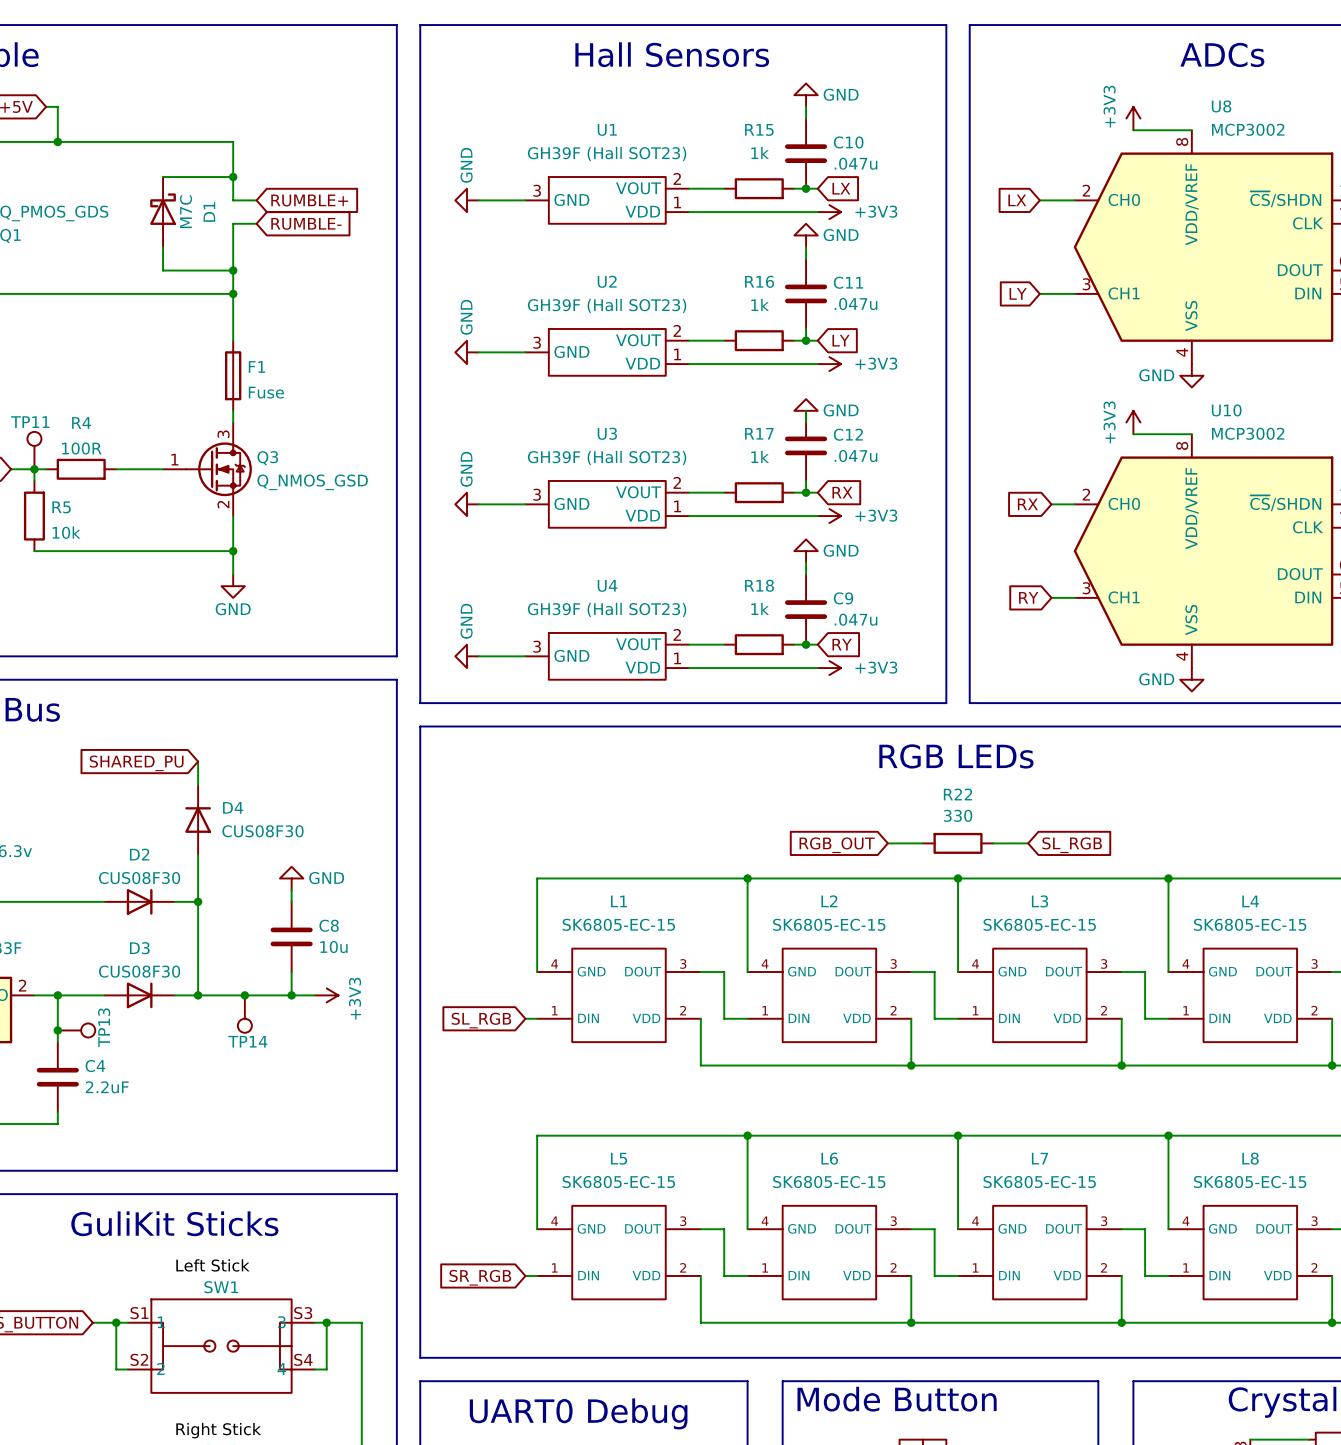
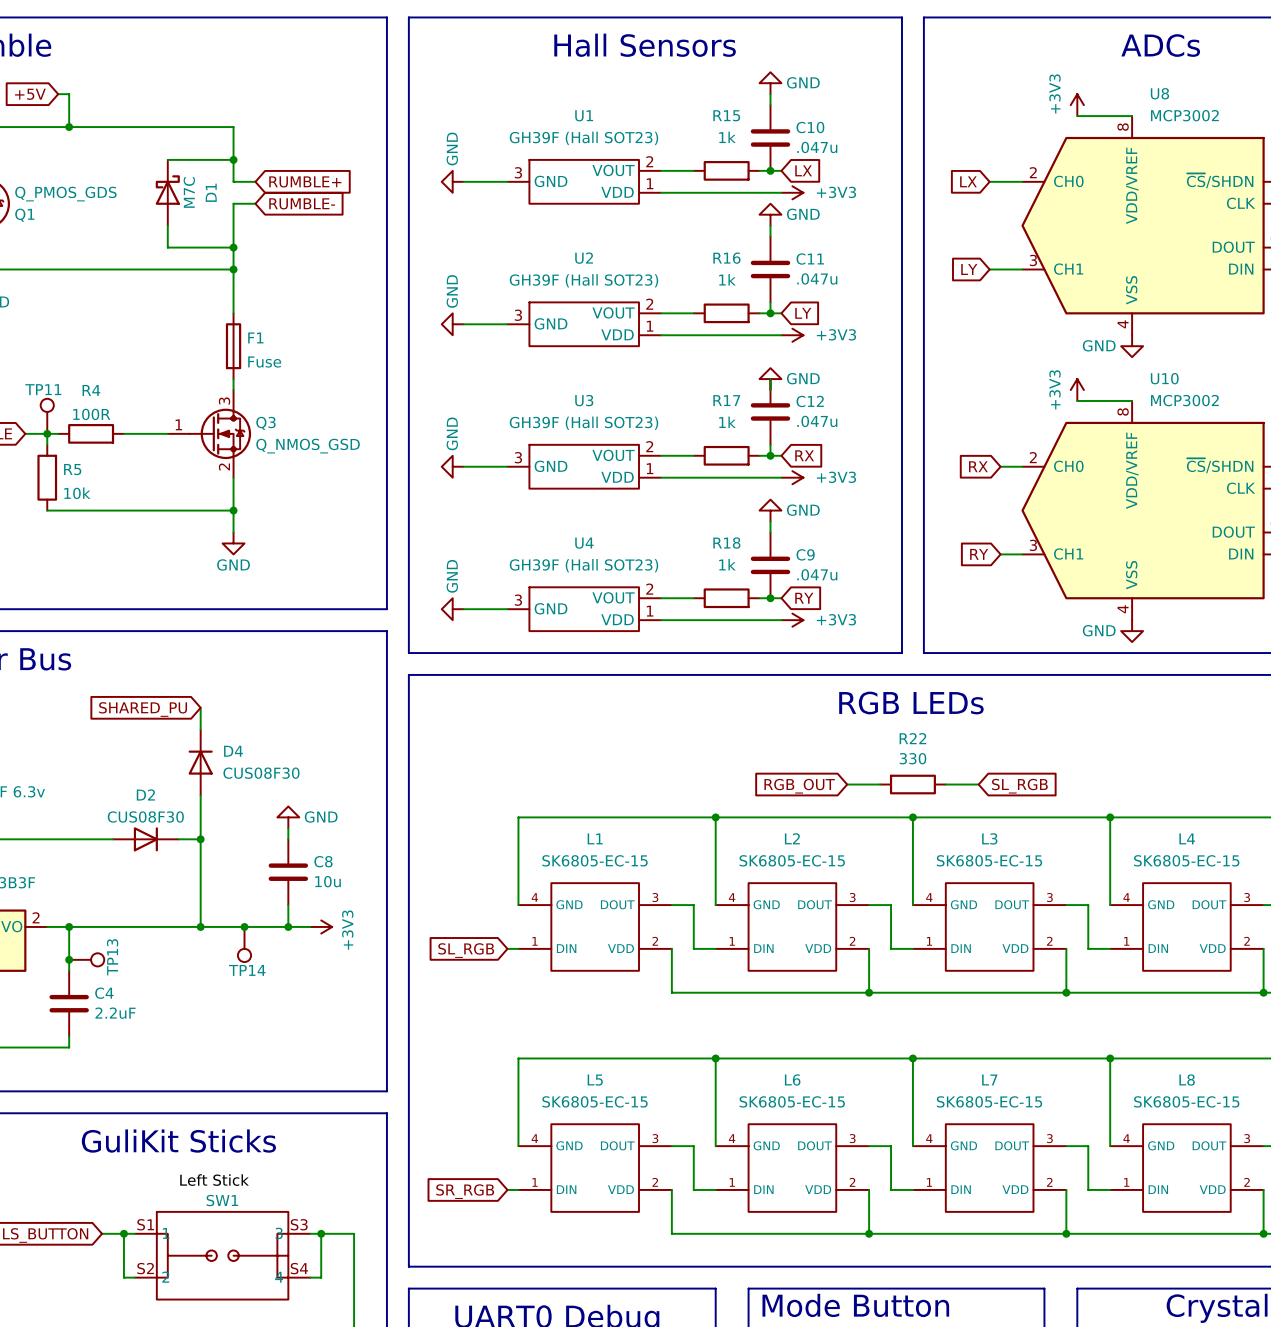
D3: CUS08F30 (139, 995) -> none

